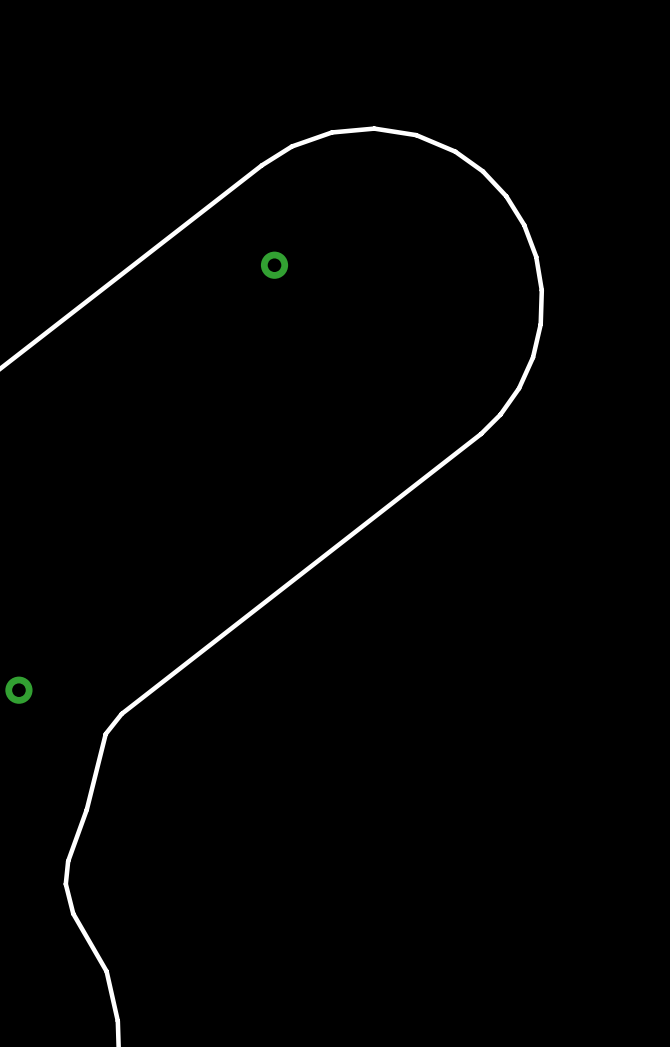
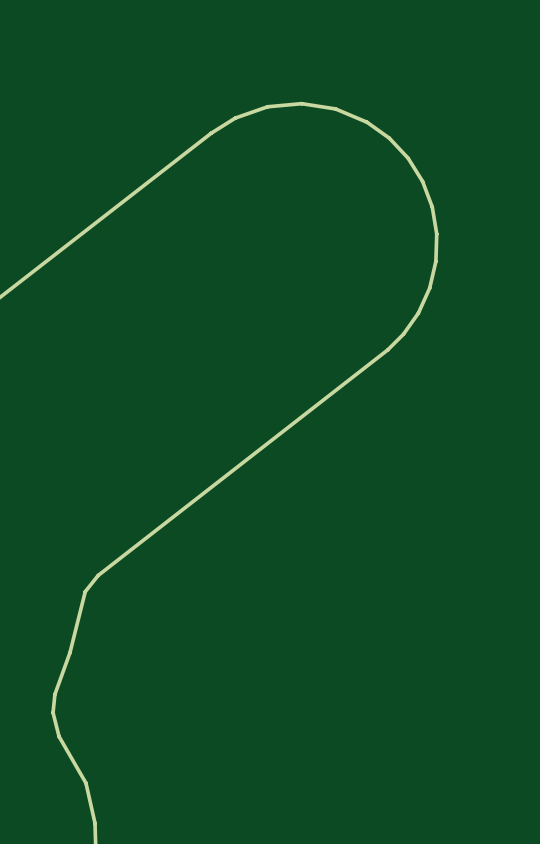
via: (274, 265) -> none
via: (18, 690) -> none

